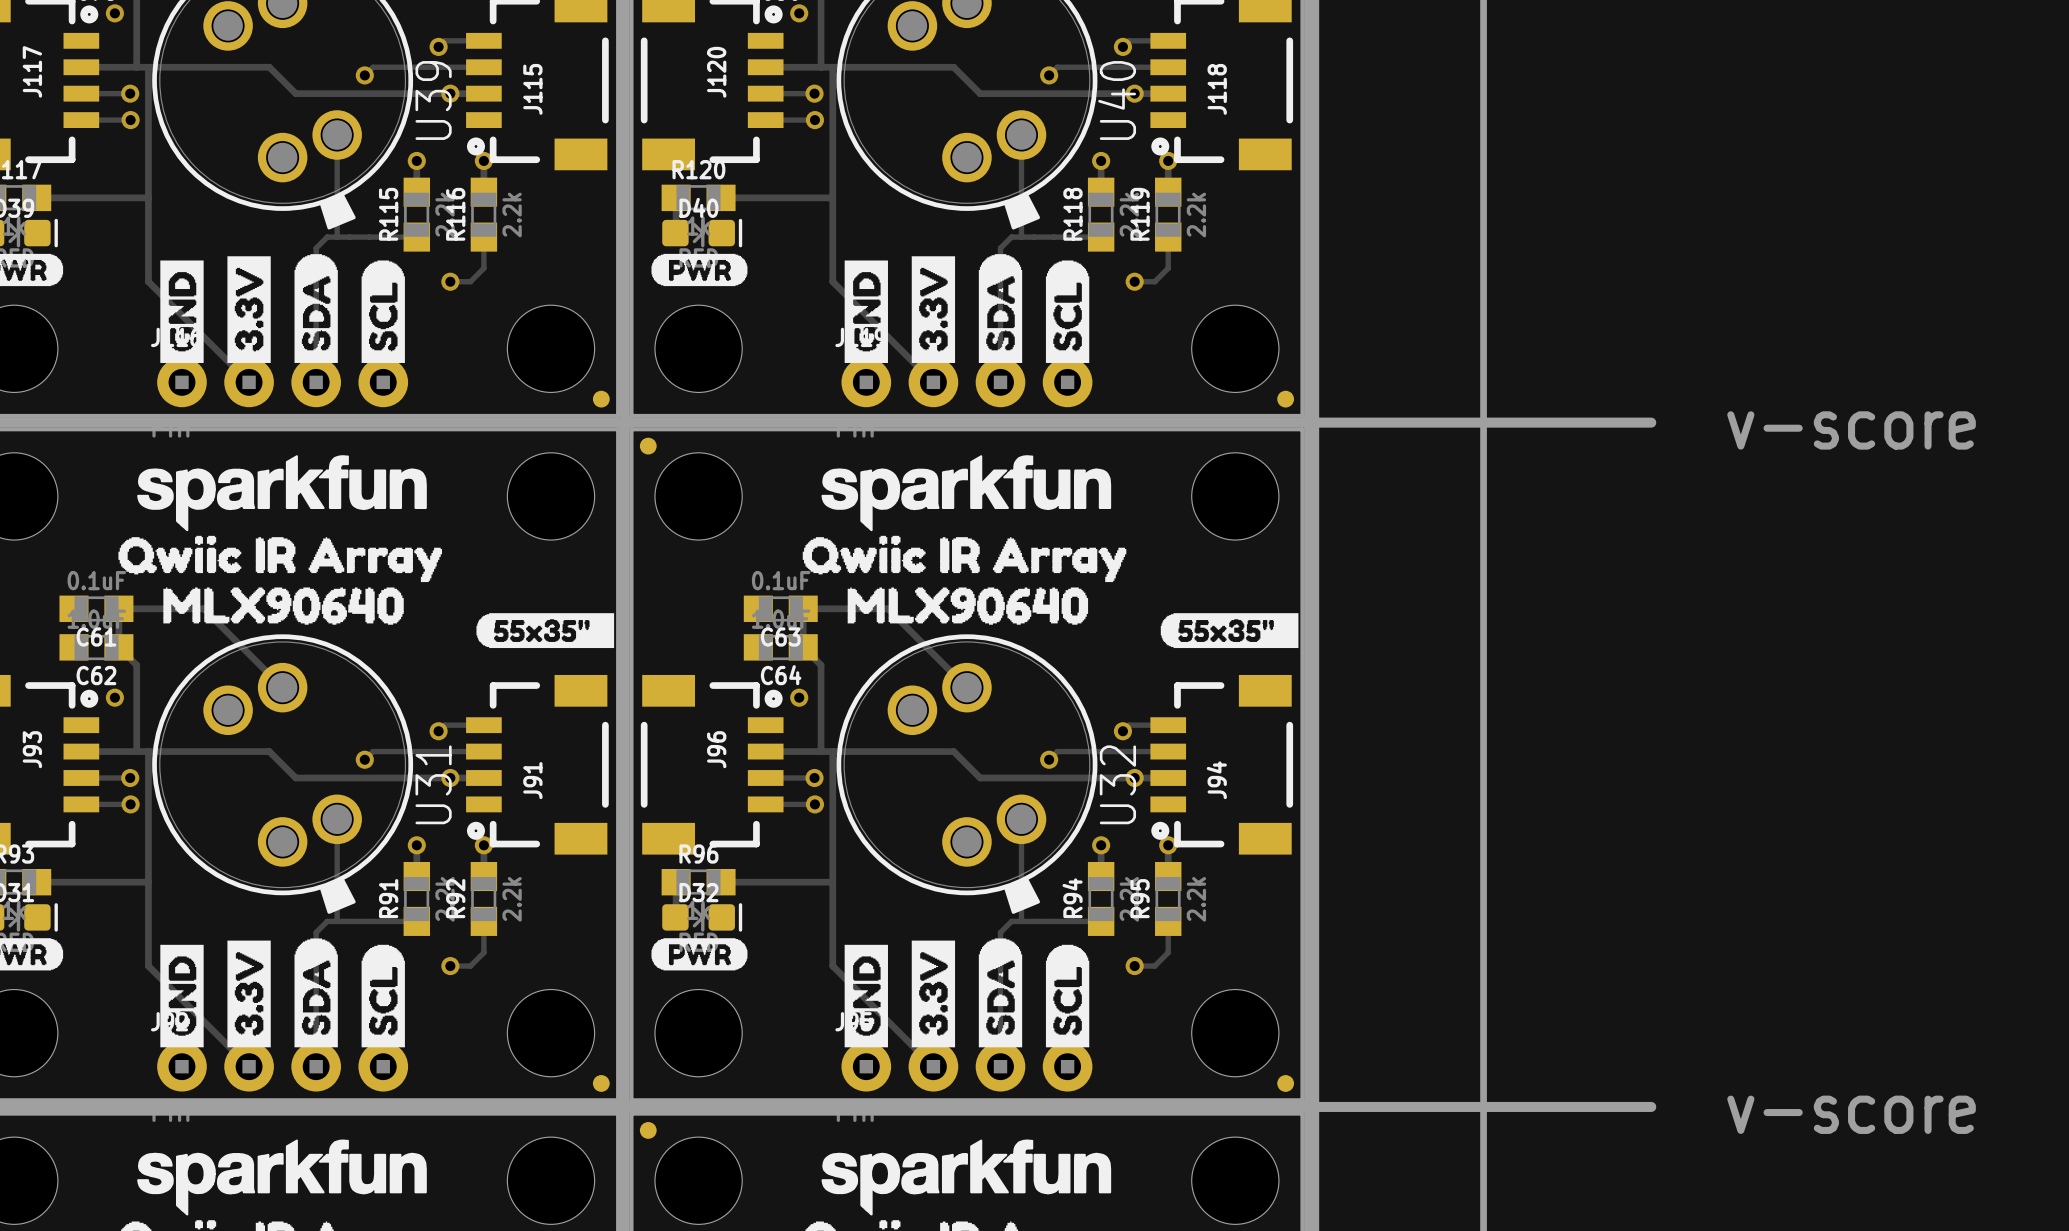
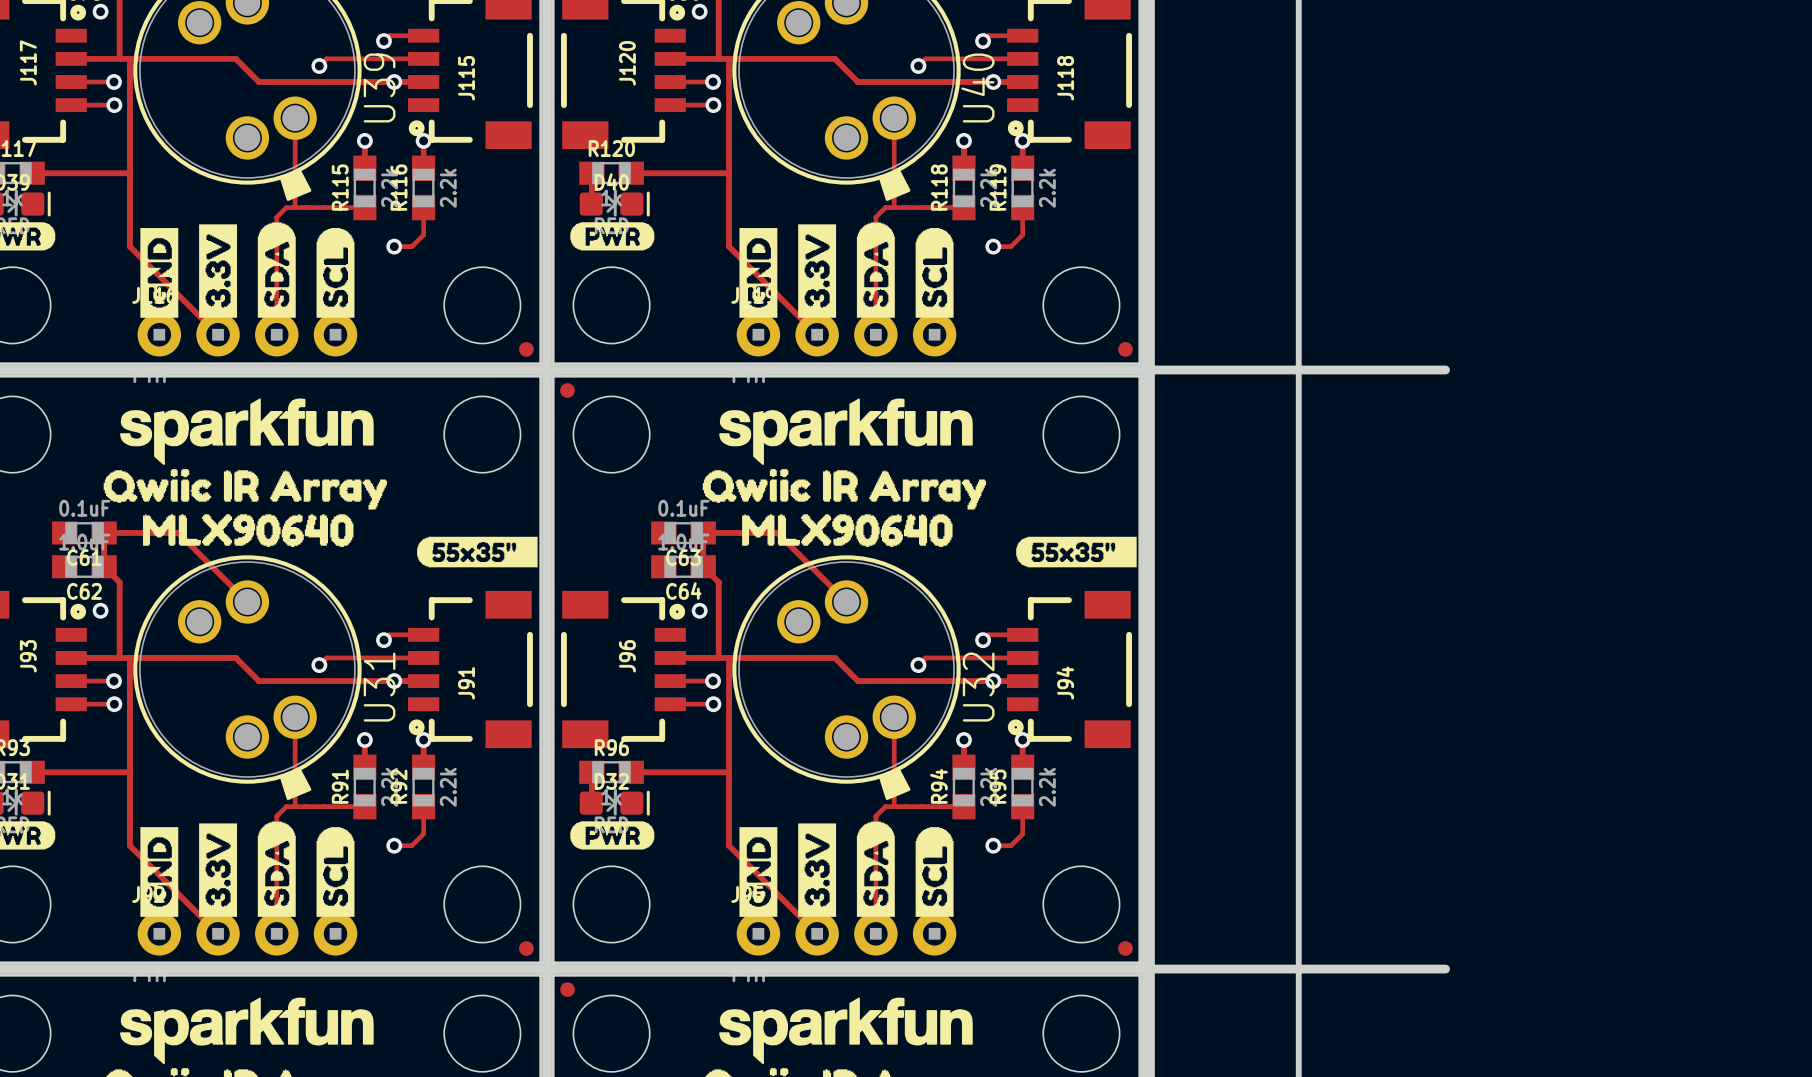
text: v-score (1851, 430) -> none
text: v-score (1851, 1114) -> none

